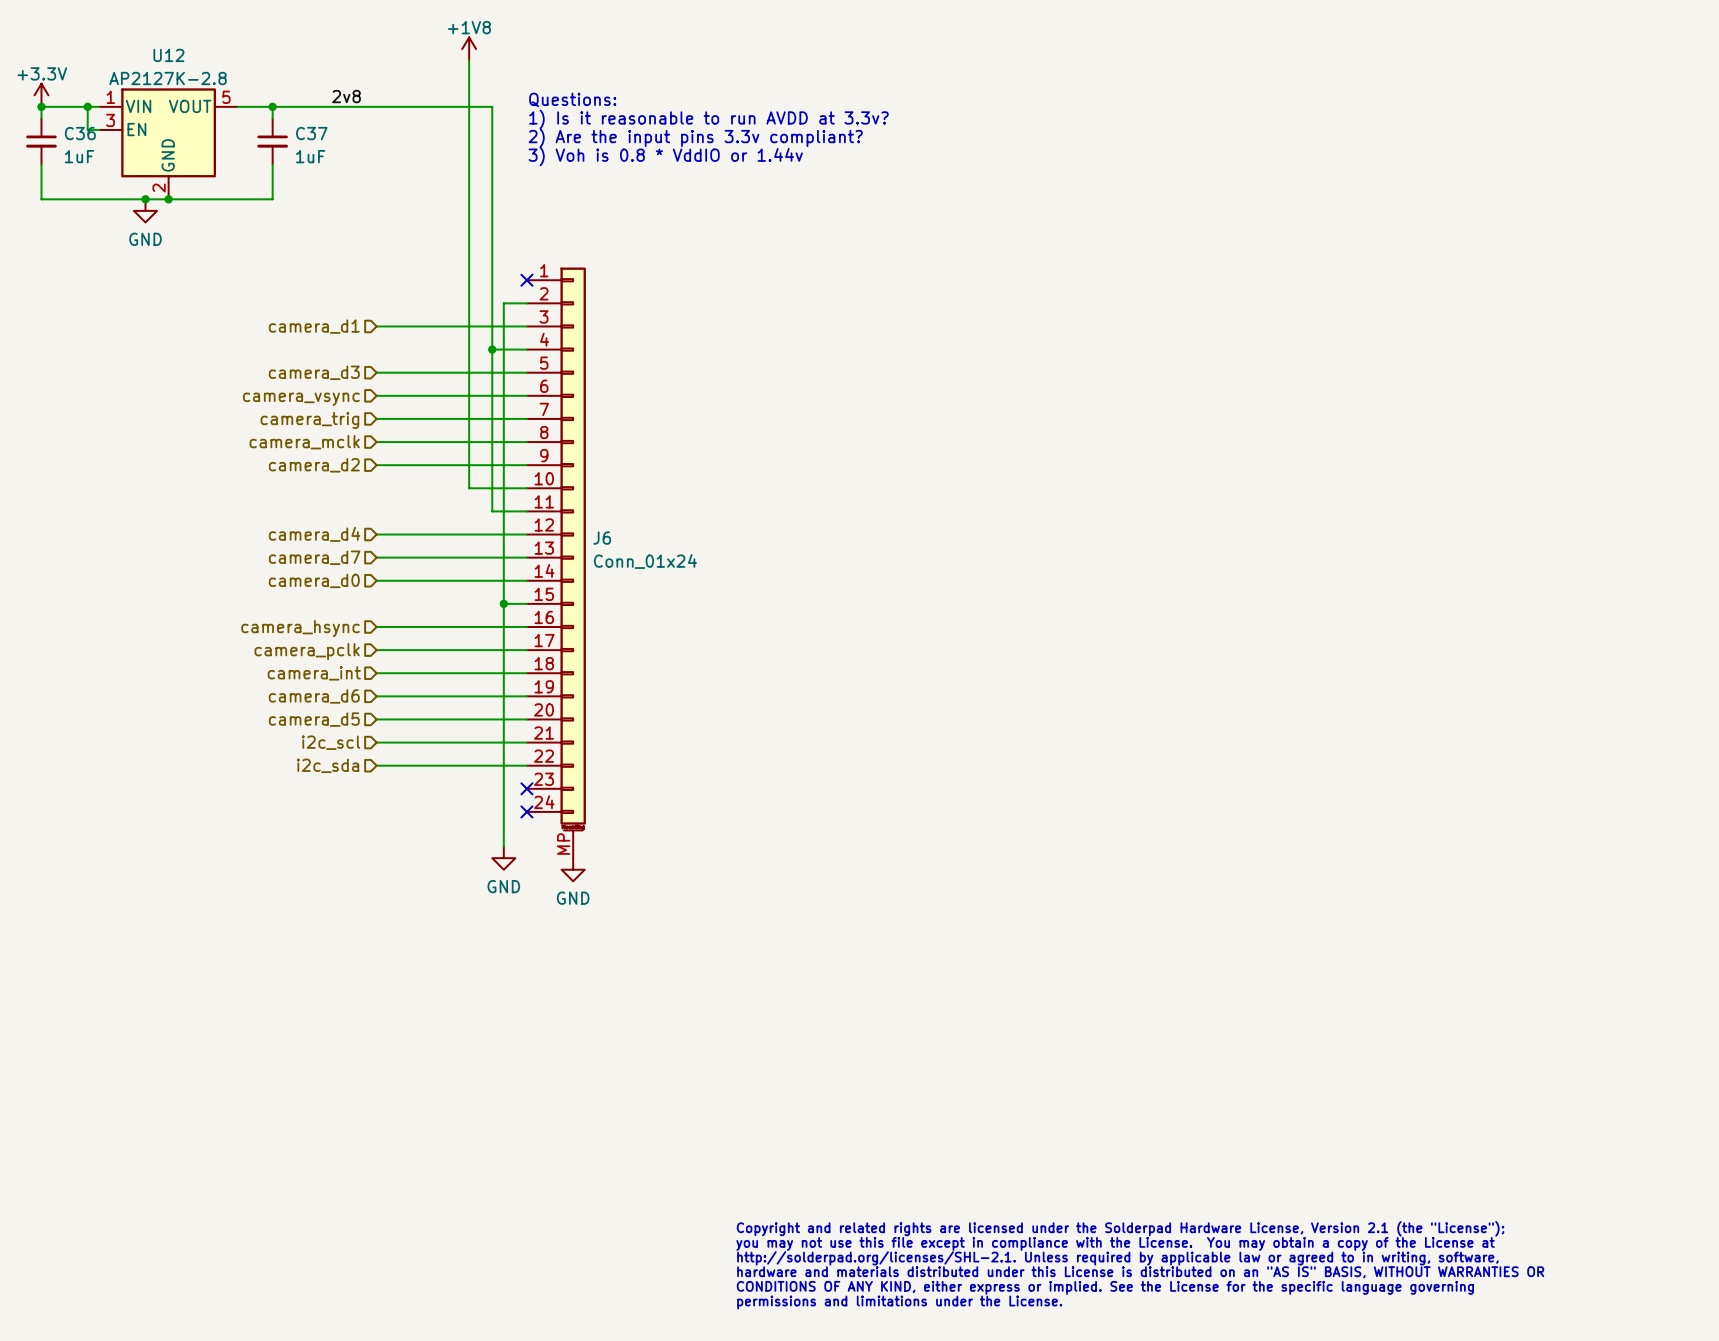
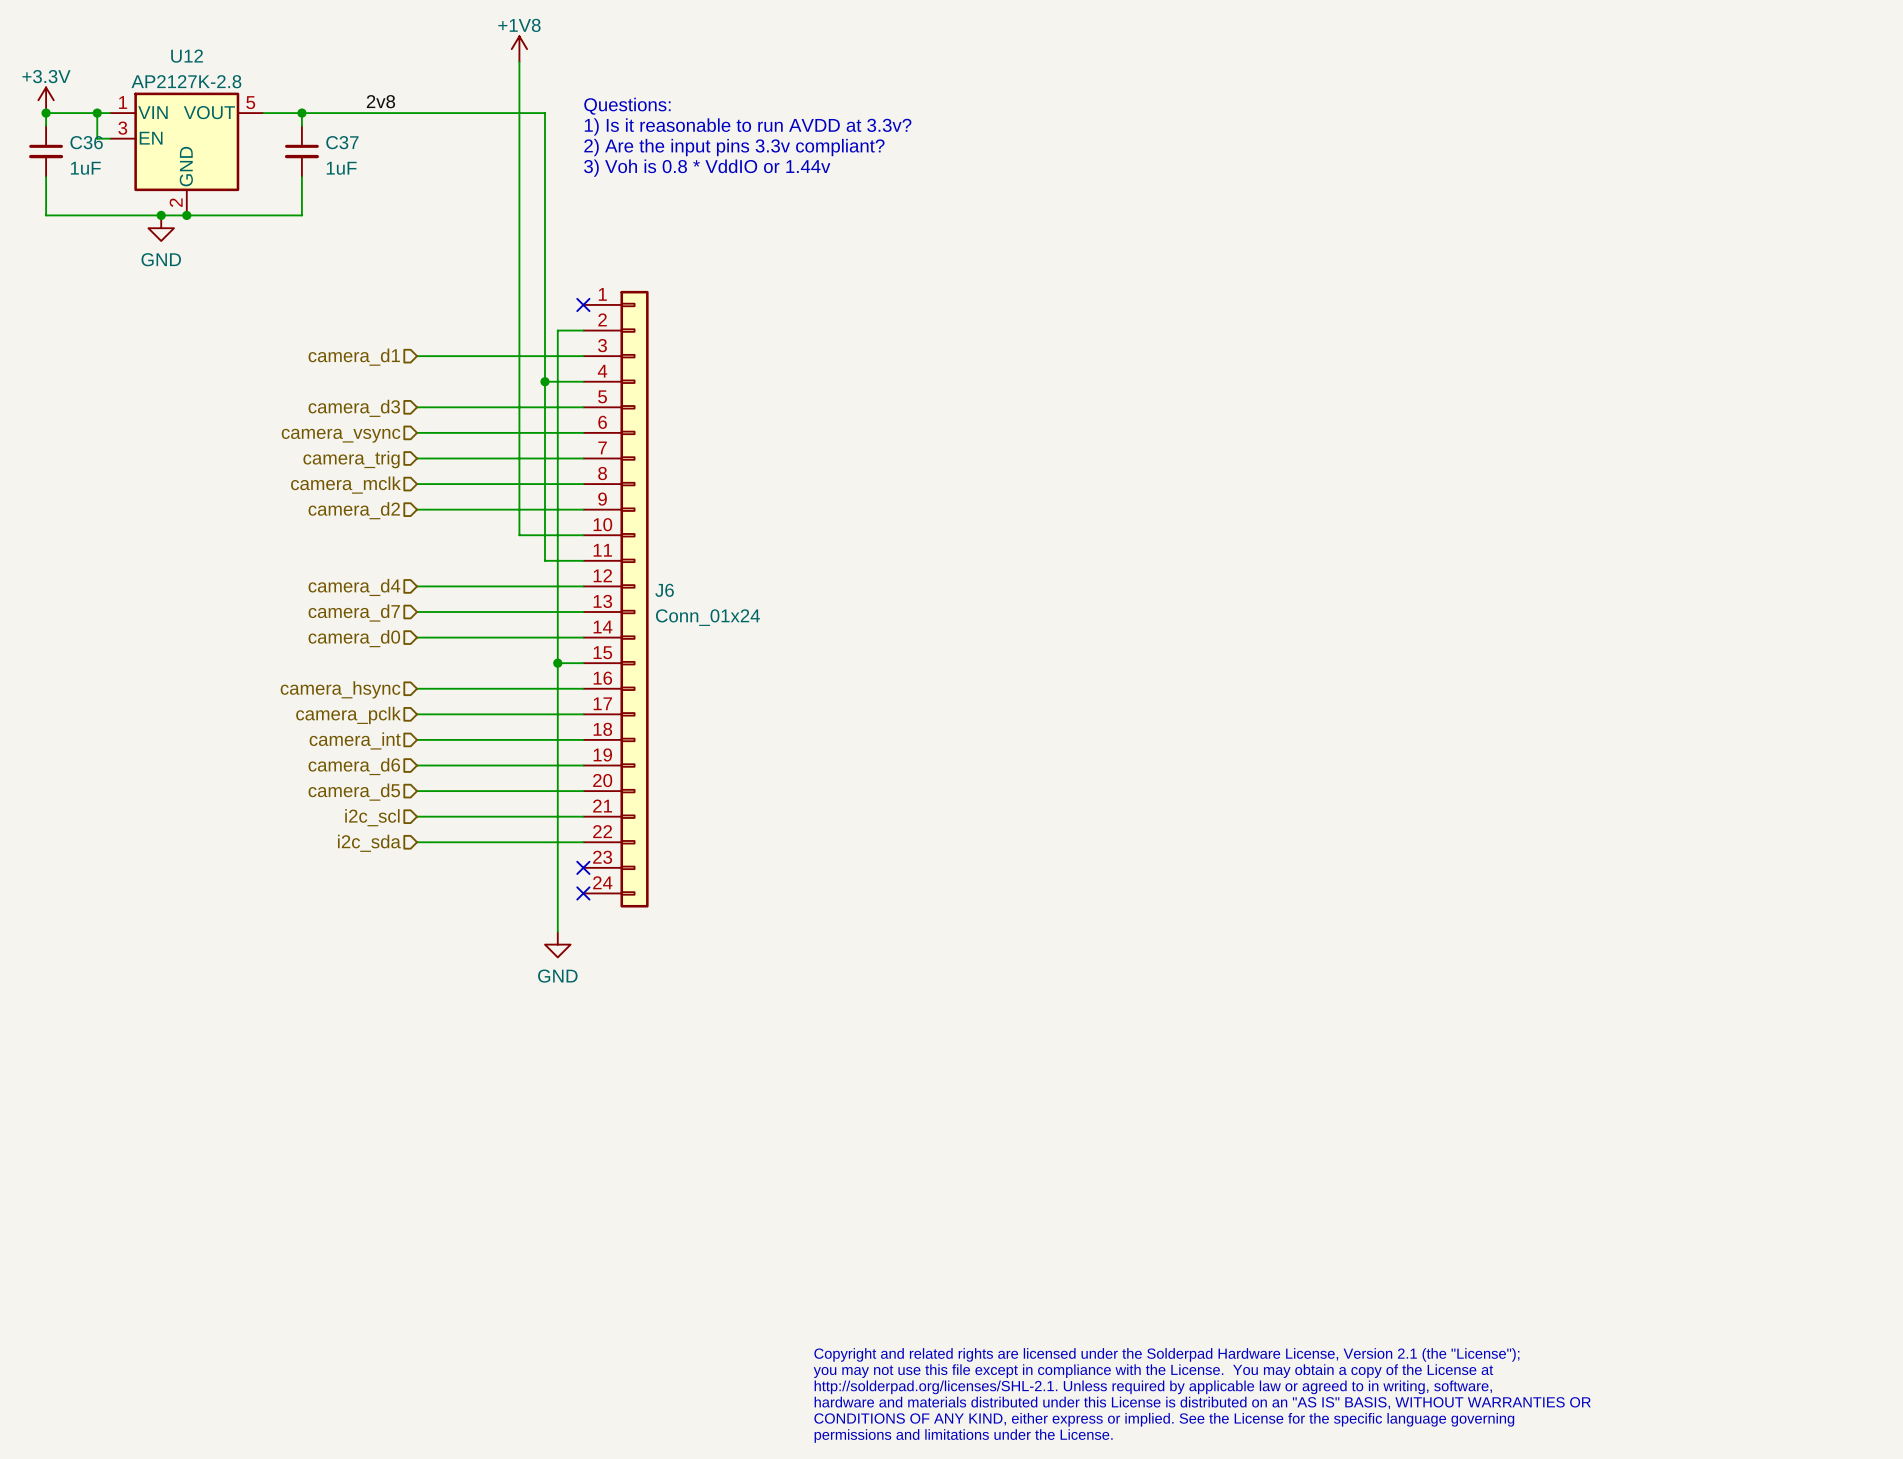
J6 symbol: [526, 267, 586, 859] -> [583, 290, 649, 908]
power symbol: GND (573, 869) -> none

